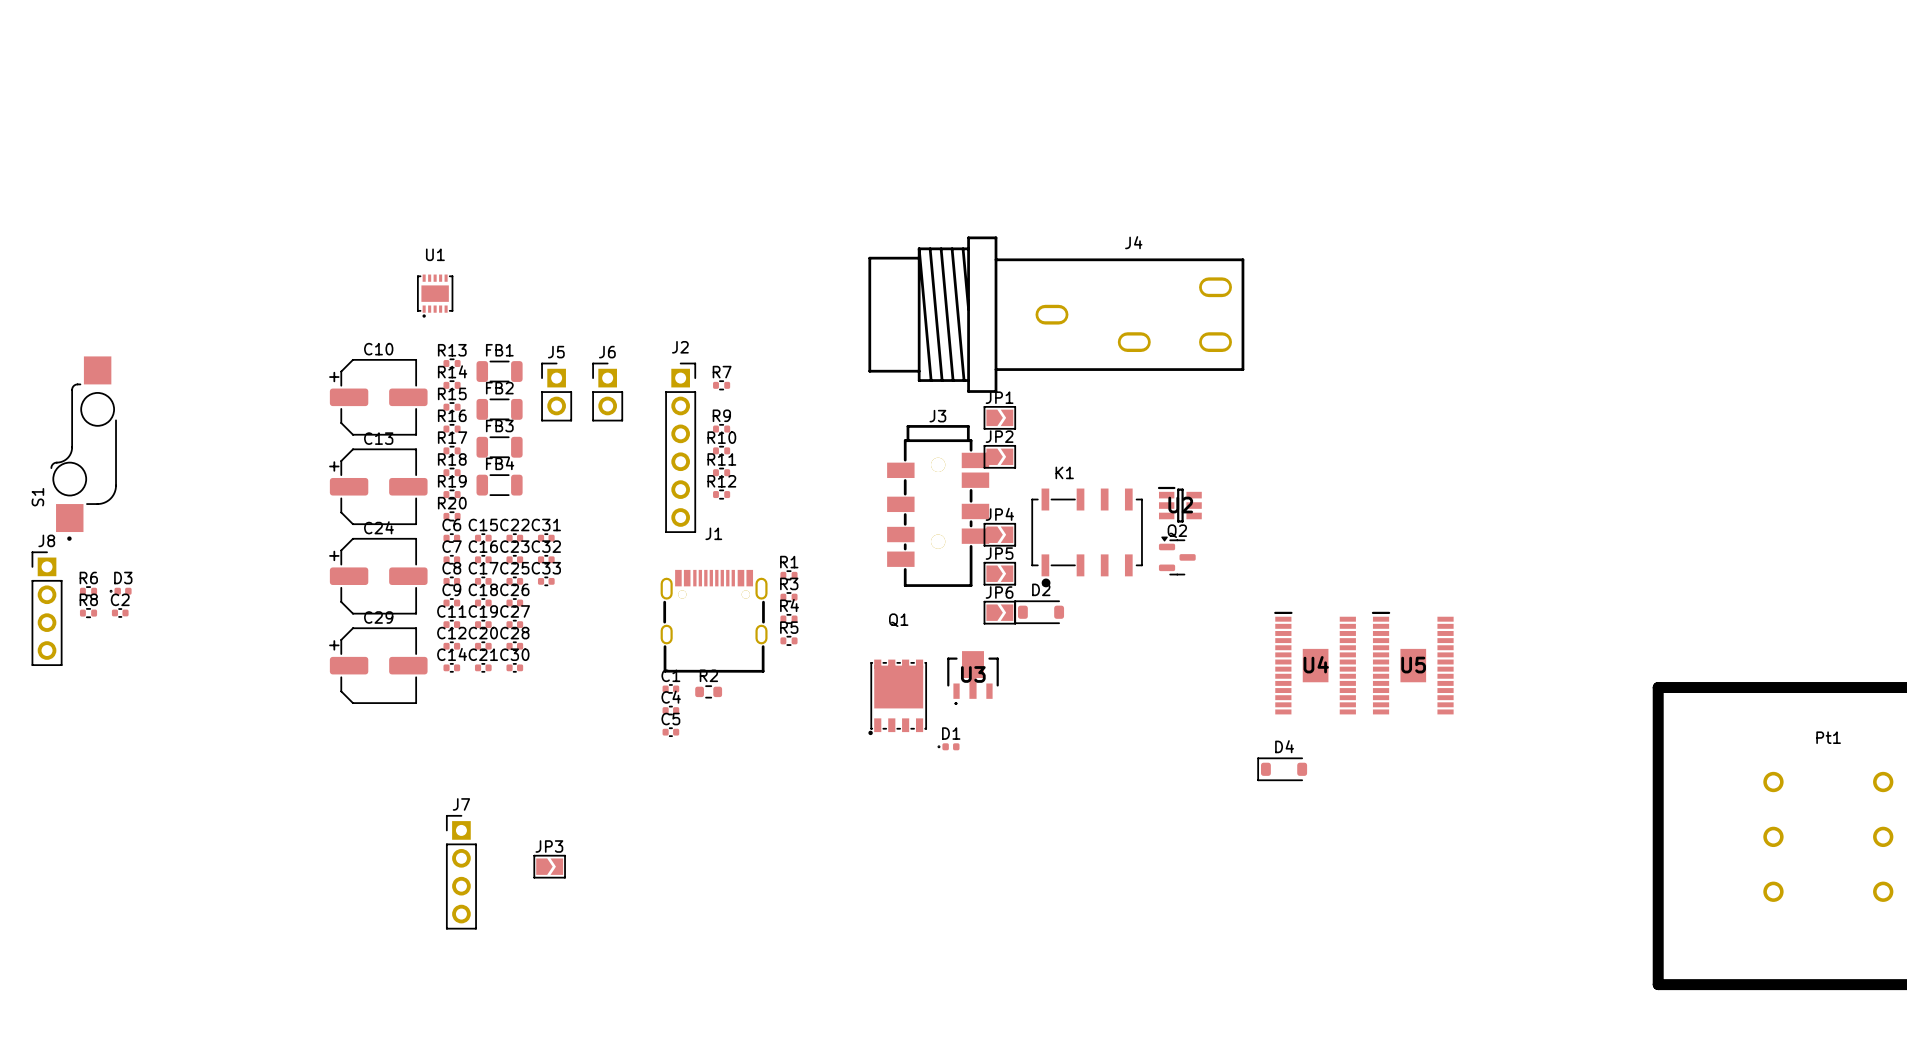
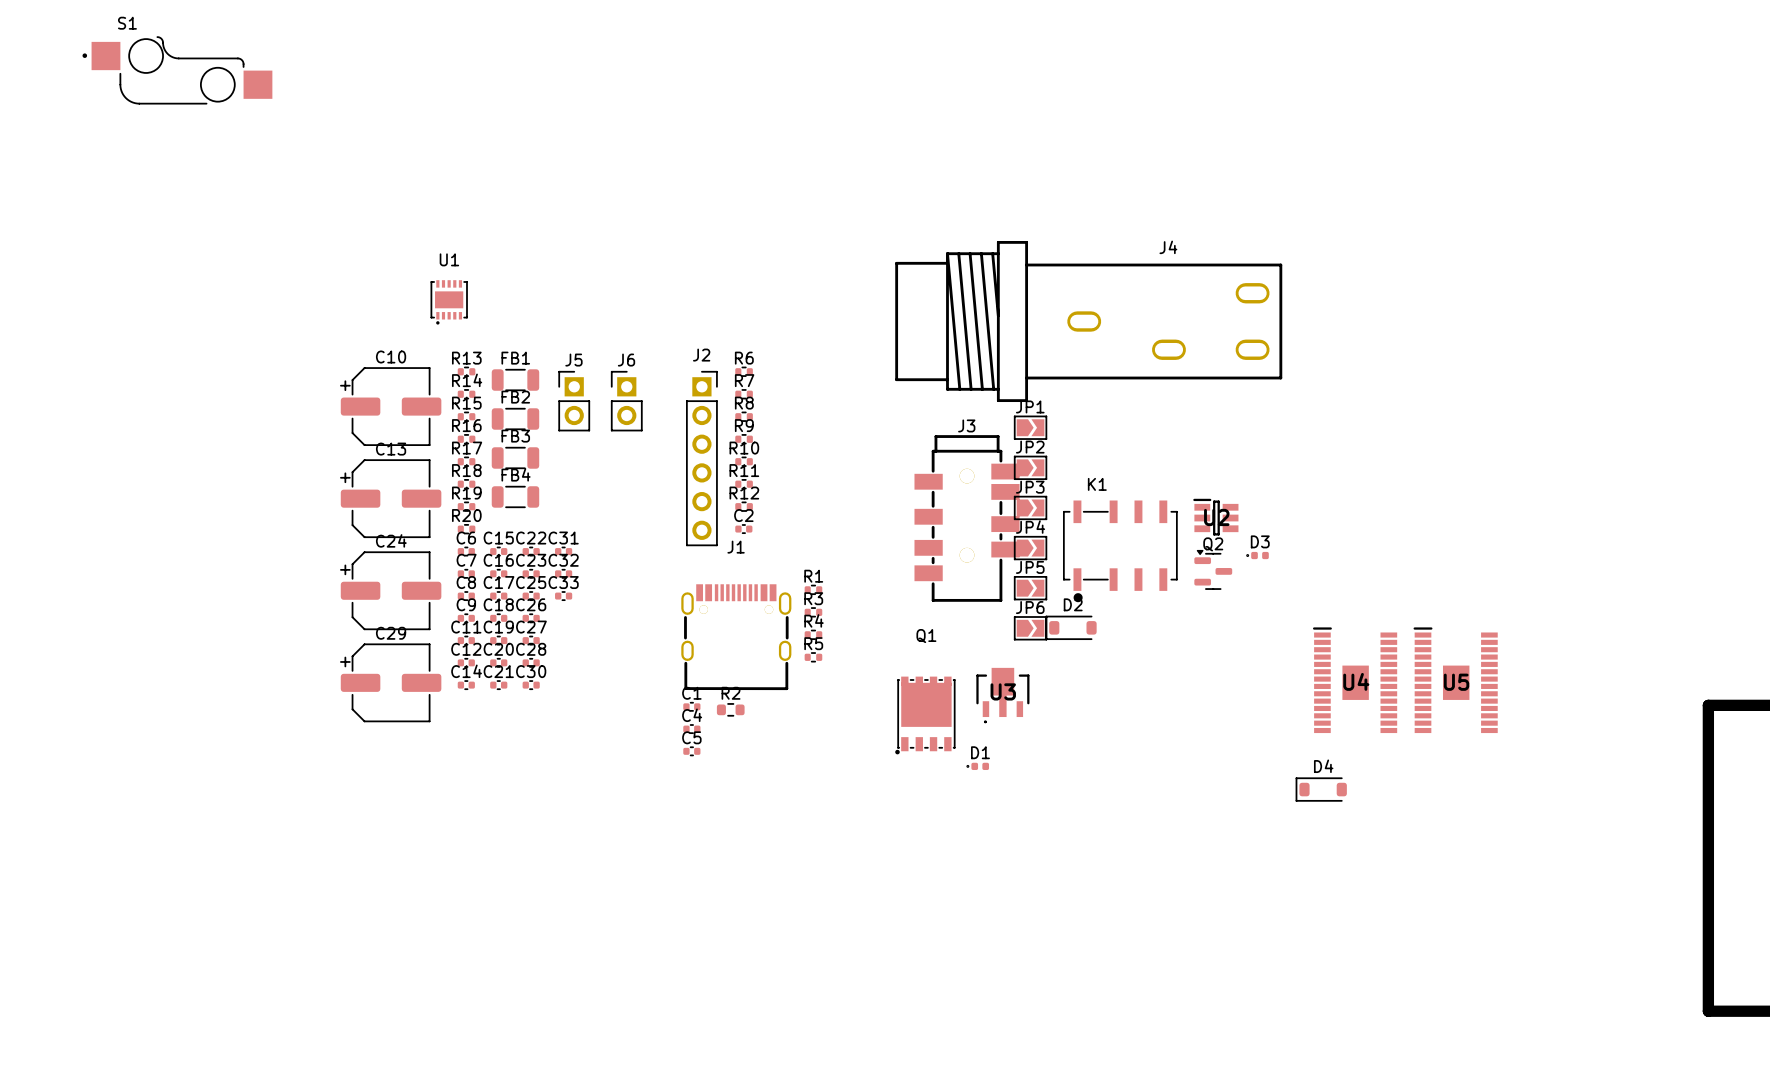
S1 rotation: 0° (83, 448) -> 90° clockwise (177, 70)
S1 position: (83, 448) -> (177, 70)
R6 position: (88, 591) -> (744, 371)
D3 position: (120, 591) -> (1257, 555)
J8: (47, 608) -> none
C2 position: (120, 612) -> (743, 529)
R8 position: (88, 613) -> (744, 416)
JP3 position: (549, 866) -> (1030, 507)
J7: (461, 872) -> none

